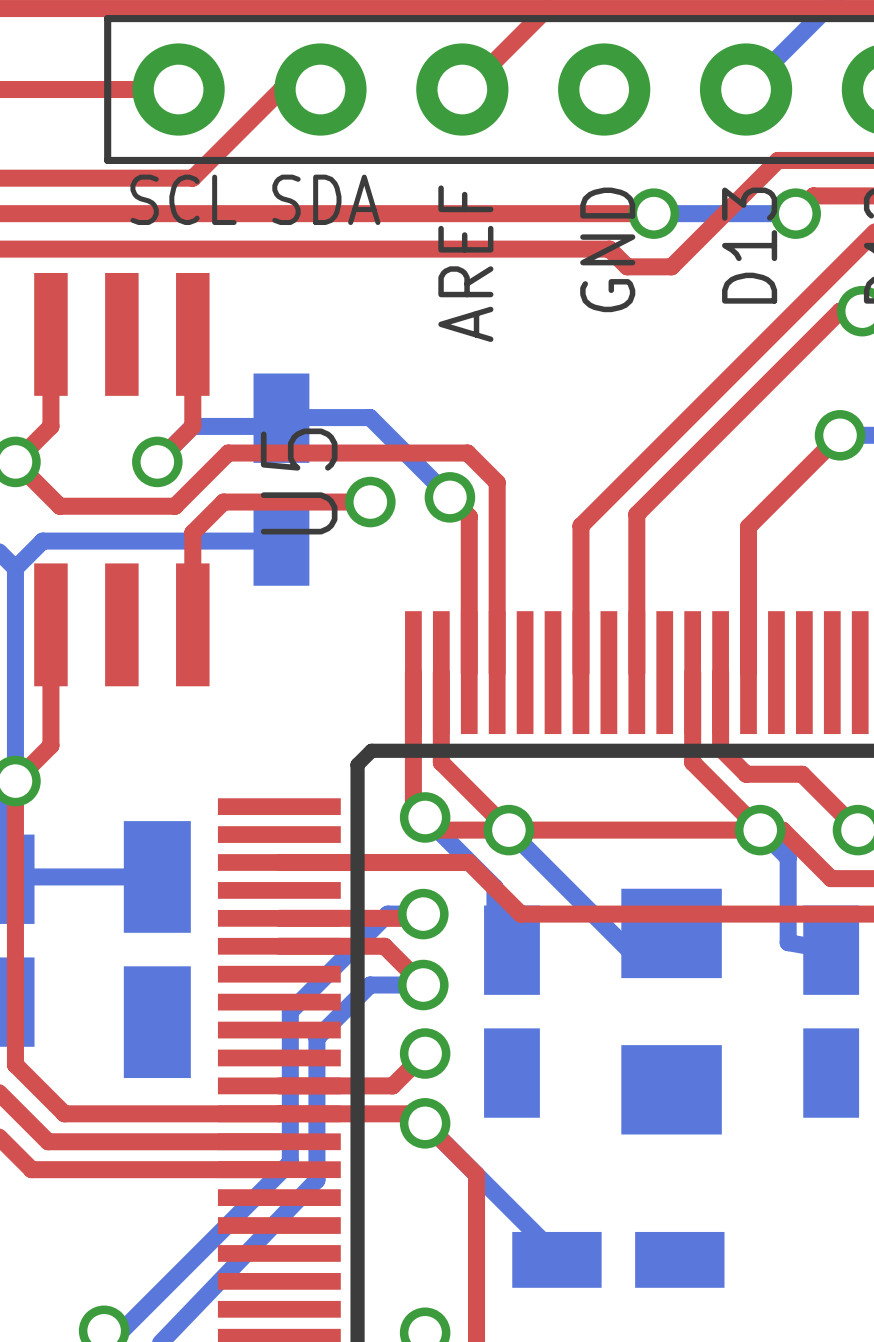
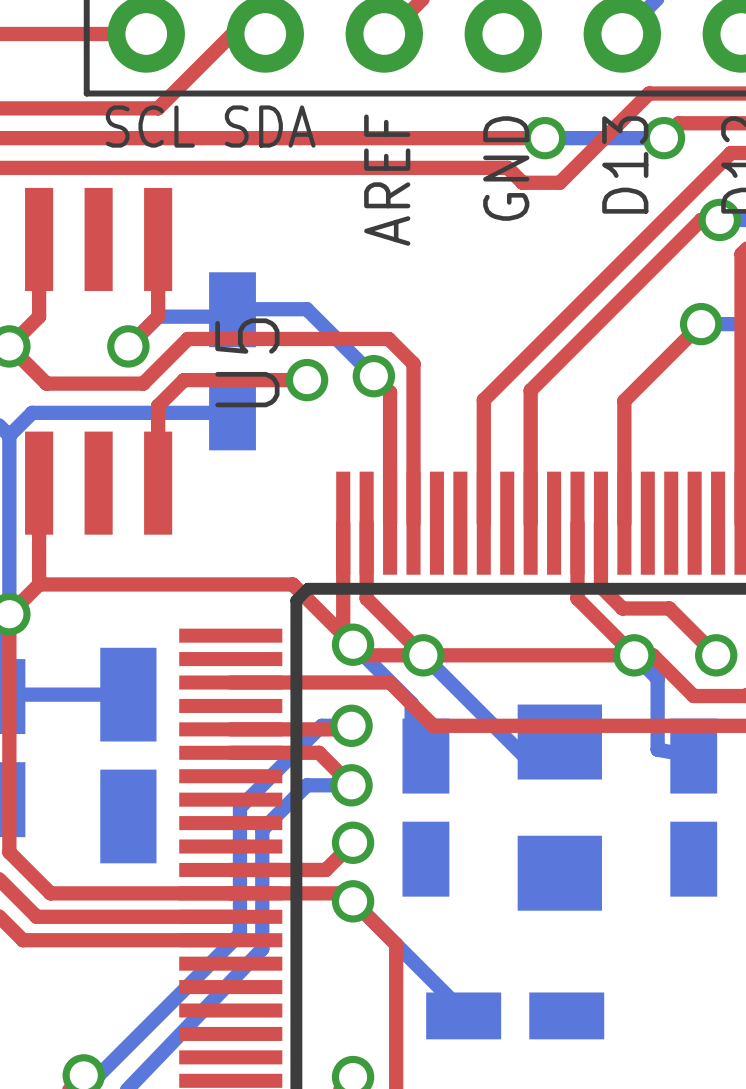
top track: none -> (39, 584) (292, 584) (343, 634)

